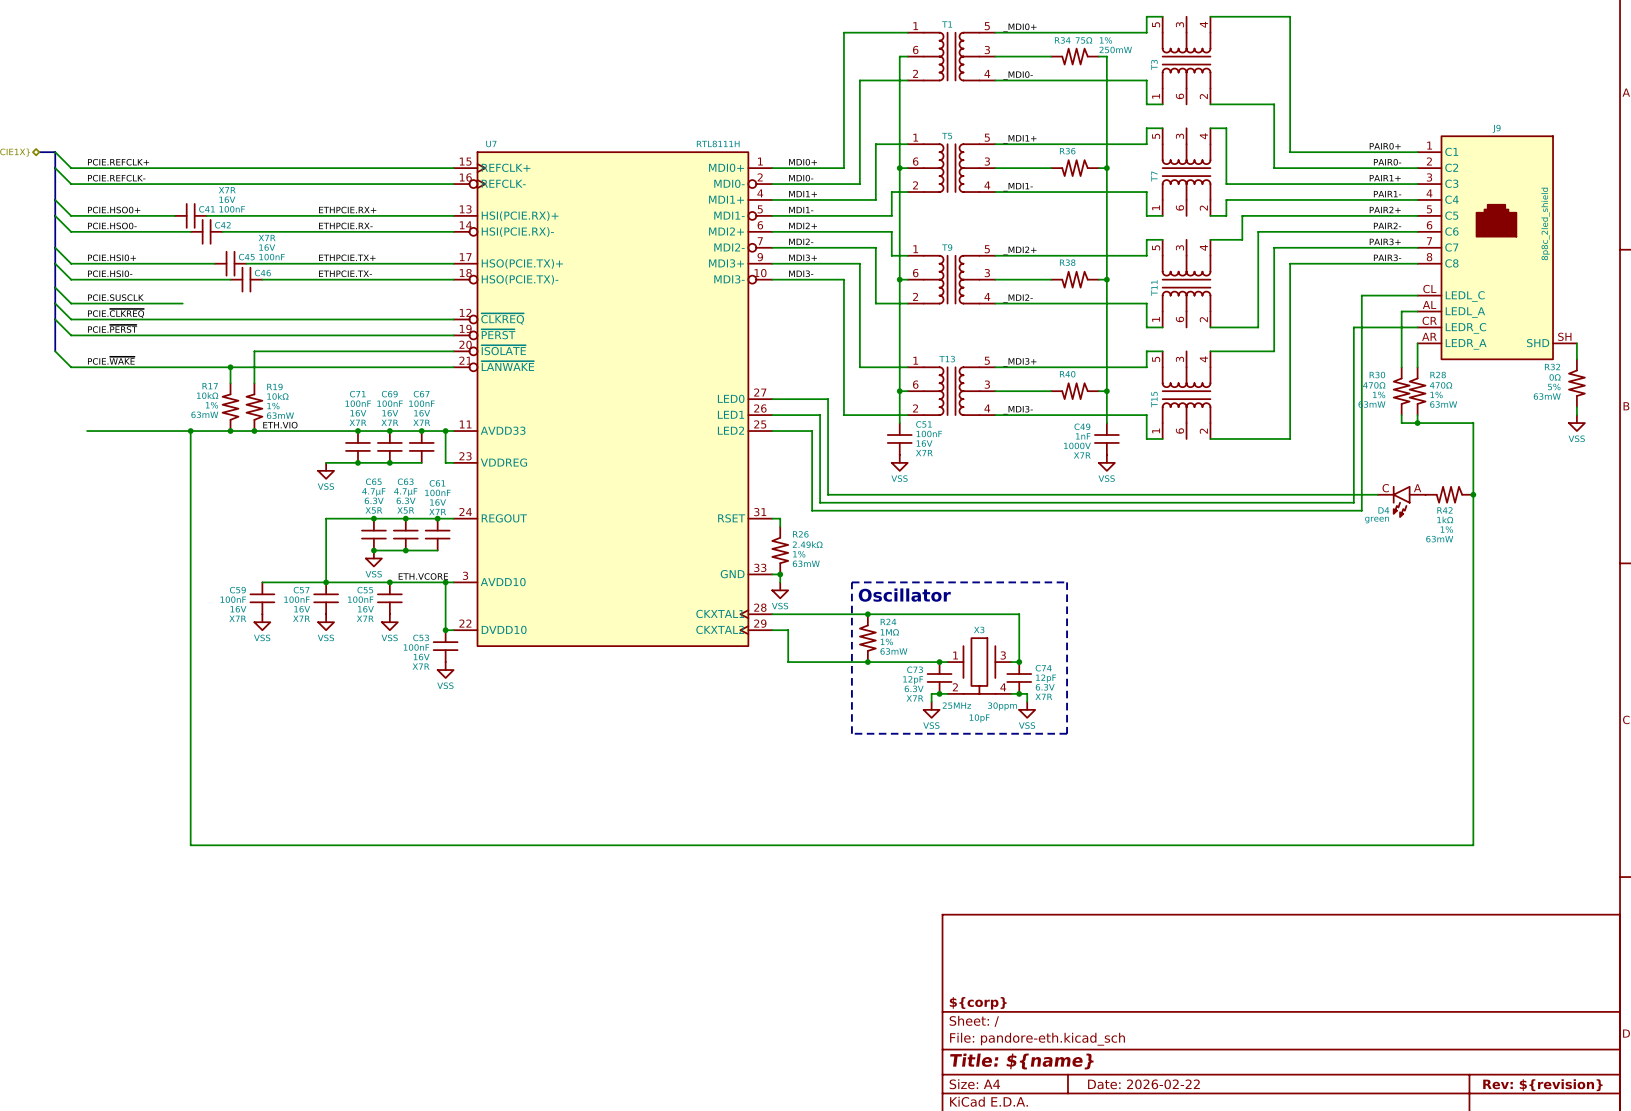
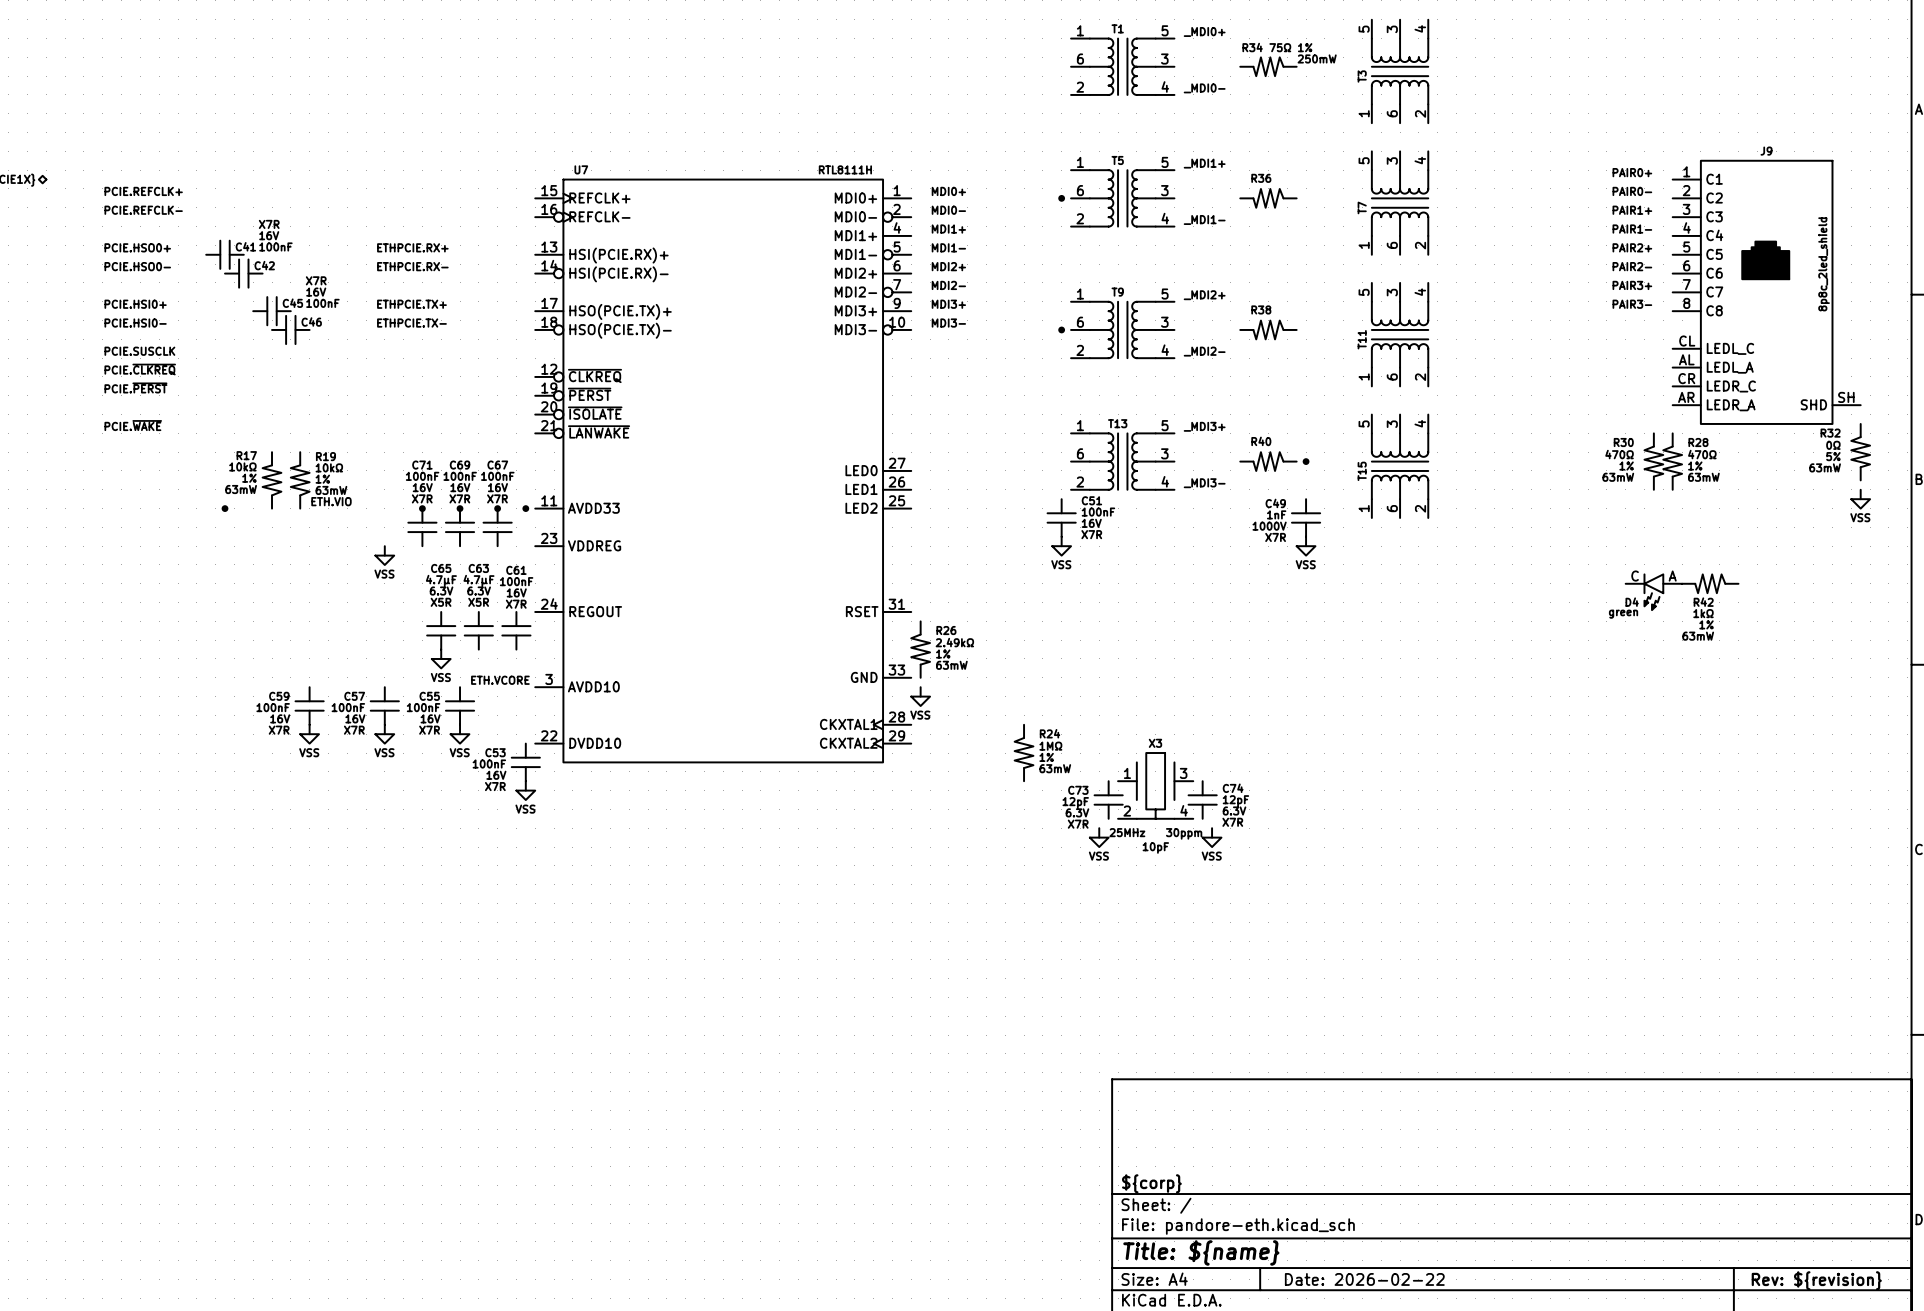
wire: (1162, 16) (1146, 16) (1146, 32) (995, 32) -> none
wire: (1210, 16) (1290, 16) (1290, 152) (1417, 152) -> none
wire: (907, 32) (843, 32) (843, 168) (772, 168) -> none
wire: (907, 56) (899, 56) (899, 423) -> none
wire: (995, 56) (1051, 56) -> none
wire: (1098, 56) (1106, 56) (1106, 423) -> none
wire: (907, 80) (859, 80) (859, 184) (772, 184) -> none
wire: (995, 80) (1146, 80) (1146, 104) (1162, 104) -> none
wire: (1210, 104) (1274, 104) (1274, 168) (1417, 168) -> none
wire: (1162, 128) (1146, 128) (1146, 144) (995, 144) -> none
wire: (1210, 128) (1226, 128) (1226, 184) (1417, 184) -> none
wire: (907, 144) (875, 144) (875, 199) (772, 199) -> none
bus: (39, 152) (55, 152) (55, 351) -> none
wire: (55, 152) (71, 168) (453, 168) -> none
wire: (55, 168) (71, 184) (453, 184) -> none
wire: (899, 168) (907, 168) -> none
wire: (995, 168) (1051, 168) -> none
wire: (1098, 168) (1106, 168) -> none
junction: (1106, 168) -> none
wire: (907, 192) (891, 192) (891, 215) (772, 215) -> none
wire: (995, 192) (1146, 192) (1146, 215) (1162, 215) -> none
wire: (55, 199) (71, 215) (174, 215) -> none
wire: (1417, 199) (1226, 199) (1226, 215) (1210, 215) -> none
wire: (55, 215) (71, 231) (190, 231) -> none
wire: (206, 215) (453, 215) -> none
wire: (1417, 215) (1242, 215) (1242, 239) (1210, 239) -> none
wire: (222, 231) (453, 231) -> none
wire: (772, 231) (891, 231) (891, 255) (907, 255) -> none
wire: (1417, 231) (1258, 231) (1258, 327) (1210, 327) -> none
wire: (1162, 239) (1146, 239) (1146, 255) (995, 255) -> none
wire: (55, 247) (71, 263) (214, 263) -> none
wire: (772, 247) (875, 247) (875, 303) (907, 303) -> none
wire: (1417, 247) (1274, 247) (1274, 351) (1210, 351) -> none
wire: (55, 263) (71, 279) (230, 279) -> none
wire: (246, 263) (453, 263) -> none
wire: (772, 263) (859, 263) (859, 367) (907, 367) -> none
wire: (1417, 263) (1290, 263) (1290, 438) (1210, 438) -> none
wire: (262, 279) (453, 279) -> none
wire: (772, 279) (843, 279) (843, 415) (907, 415) -> none
wire: (899, 279) (907, 279) -> none
wire: (995, 279) (1051, 279) -> none
wire: (1098, 279) (1106, 279) -> none
junction: (1106, 279) -> none
wire: (55, 287) (71, 303) (182, 303) -> none
wire: (1417, 295) (1361, 295) (1361, 510) (812, 510) (812, 431) (772, 431) -> none
wire: (55, 303) (71, 319) (453, 319) -> none
wire: (995, 303) (1146, 303) (1146, 327) (1162, 327) -> none
wire: (1417, 311) (1401, 311) (1401, 367) -> none
wire: (55, 319) (71, 335) (453, 335) -> none
wire: (1417, 327) (1353, 327) (1353, 502) (820, 502) (820, 415) (772, 415) -> none
wire: (1417, 343) (1417, 367) -> none
wire: (1576, 343) (1576, 359) -> none
wire: (55, 351) (71, 367) (453, 367) -> none
wire: (453, 351) (254, 351) (254, 383) -> none
wire: (1162, 351) (1146, 351) (1146, 367) (995, 367) -> none
wire: (230, 367) (230, 383) -> none
junction: (230, 367) -> none
wire: (899, 391) (907, 391) -> none
junction: (899, 391) -> none
wire: (995, 391) (1051, 391) -> none
wire: (1098, 391) (1106, 391) -> none
wire: (772, 399) (828, 399) (828, 494) (1377, 494) -> none
wire: (1576, 407) (1576, 415) -> none
wire: (995, 415) (1146, 415) (1146, 438) (1162, 438) -> none
wire: (1401, 415) (1401, 423) (1473, 423) (1473, 845) (190, 845) (190, 431) -> none
wire: (1417, 415) (1417, 423) -> none
junction: (1417, 423) -> none
wire: (87, 431) (453, 431) -> none
junction: (230, 431) -> none
junction: (254, 431) -> none
wire: (445, 431) (445, 462) (453, 462) -> none
wire: (326, 462) (421, 462) -> none
junction: (357, 462) -> none
junction: (389, 462) -> none
junction: (1473, 494) -> none
junction: (373, 518) -> none
junction: (405, 518) -> none
junction: (437, 518) -> none
wire: (453, 518) (326, 518) (326, 582) -> none
wire: (772, 518) (780, 518) (780, 526) -> none
wire: (373, 550) (437, 550) -> none
junction: (373, 550) -> none
junction: (405, 550) -> none
wire: (772, 574) (780, 574) (780, 582) -> none
junction: (780, 574) -> none
wire: (262, 582) (453, 582) -> none
junction: (326, 582) -> none
junction: (389, 582) -> none
wire: (445, 582) (445, 630) (453, 630) -> none
junction: (445, 582) -> none
line: (851, 582) (1067, 582) (1067, 733) (851, 733) (851, 582) -> none
text: Oscillator (904, 595) -> none
wire: (772, 614) (1019, 614) (1019, 662) (1011, 662) -> none
junction: (867, 614) -> none
junction: (445, 630) -> none
wire: (772, 630) (788, 630) (788, 662) (947, 662) -> none
junction: (867, 662) -> none
junction: (939, 662) -> none
junction: (1019, 662) -> none
junction: (939, 693) -> none
wire: (947, 693) (931, 693) (931, 701) -> none
wire: (1011, 693) (1027, 693) (1027, 701) -> none
junction: (1019, 693) -> none

